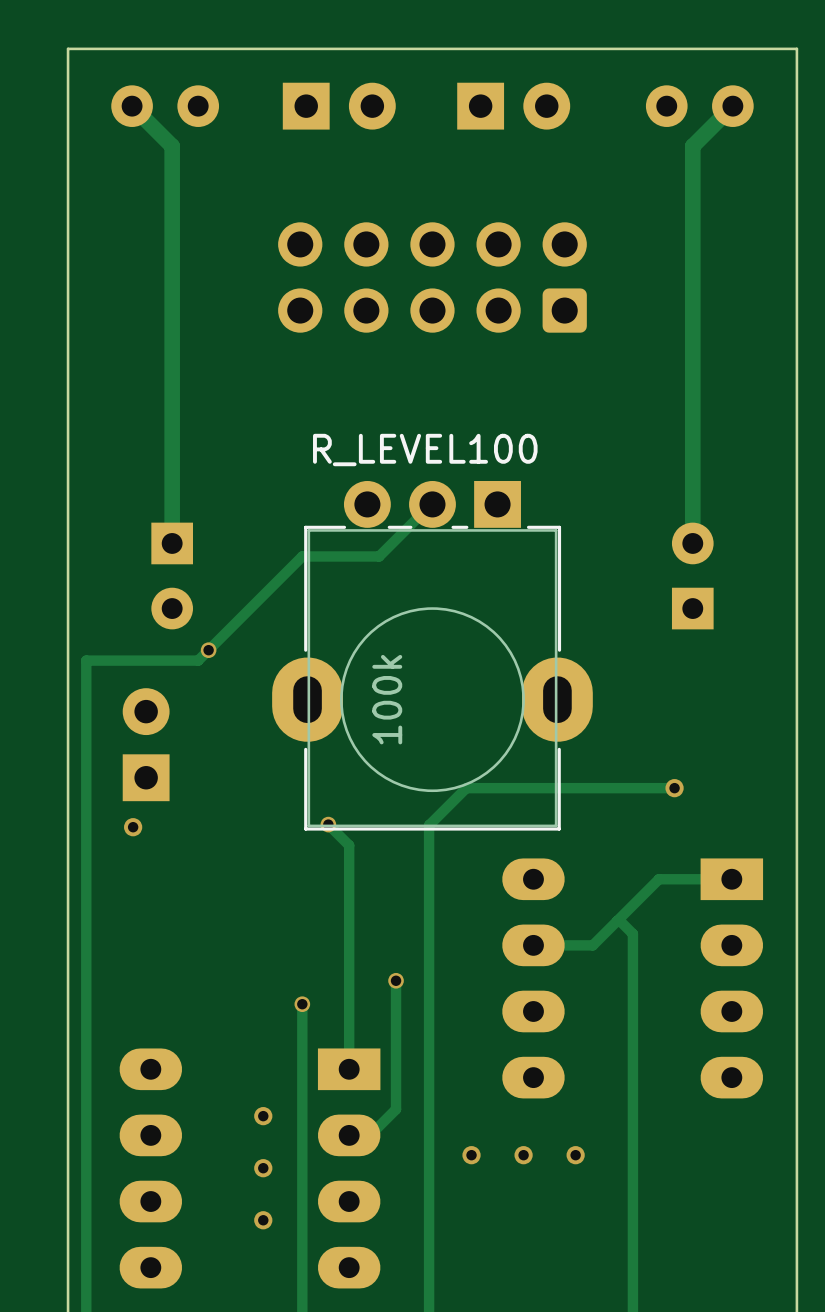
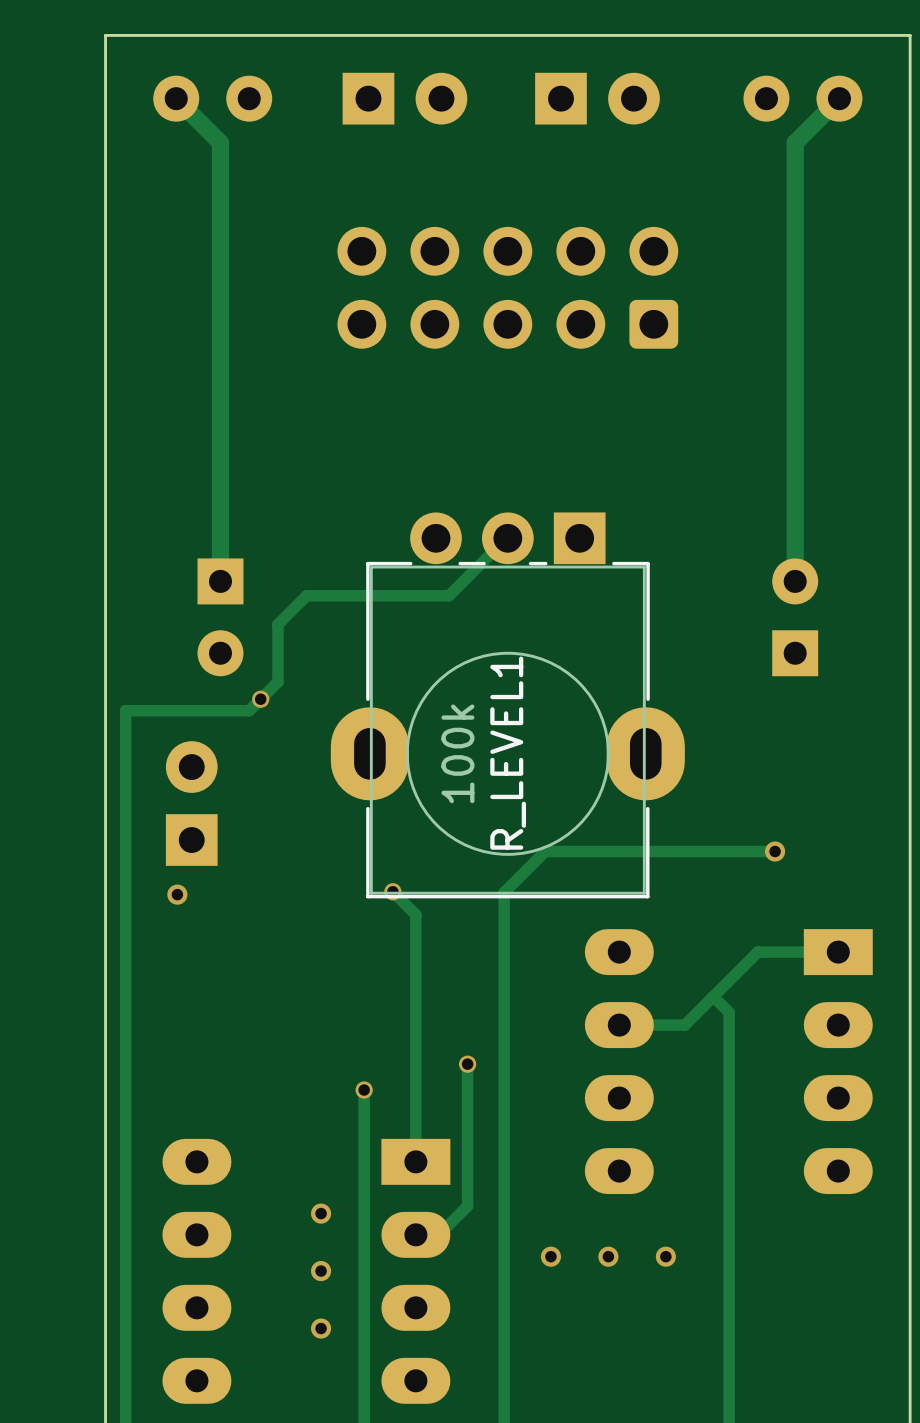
R_LEVEL100 name: R_LEVEL100 (425, 450) -> R_LEVEL1 (508, 753)
track: (302, 556) (224, 634) -> (364, 595) (306, 595) (277, 624) (277, 681)

